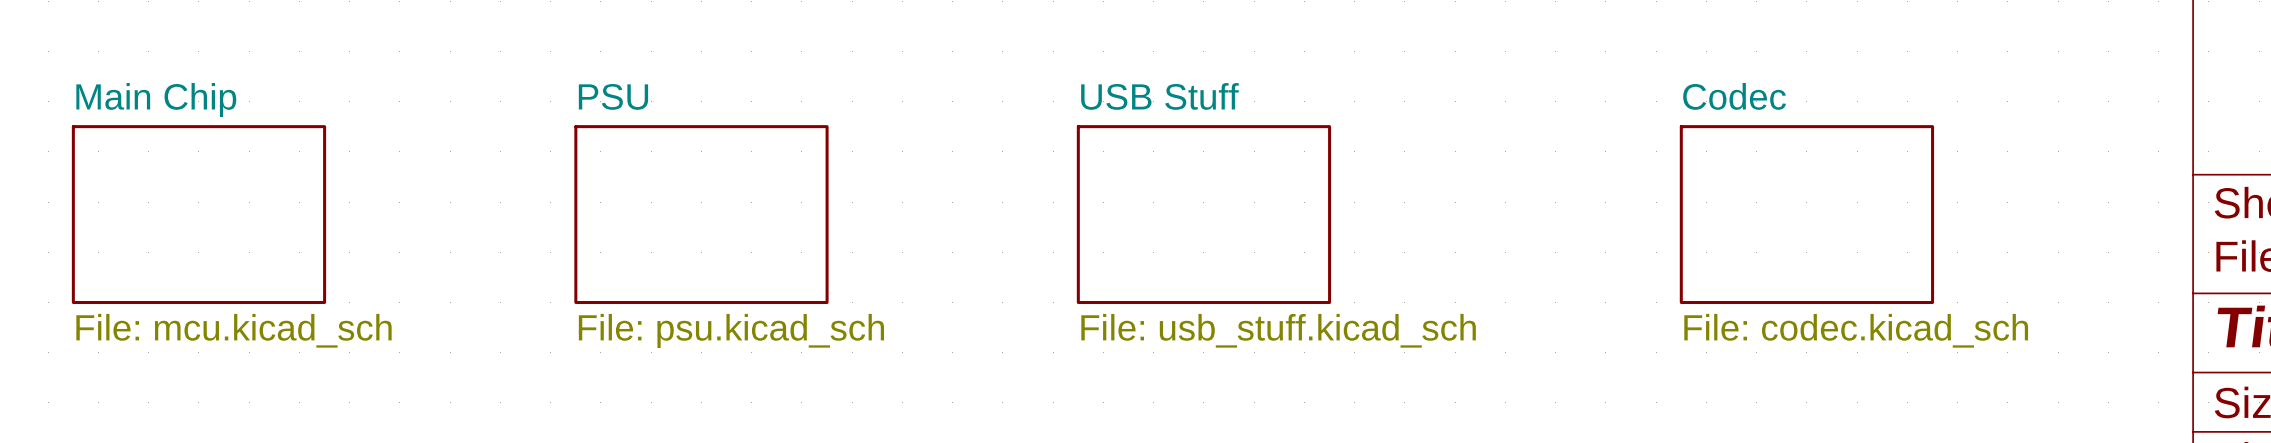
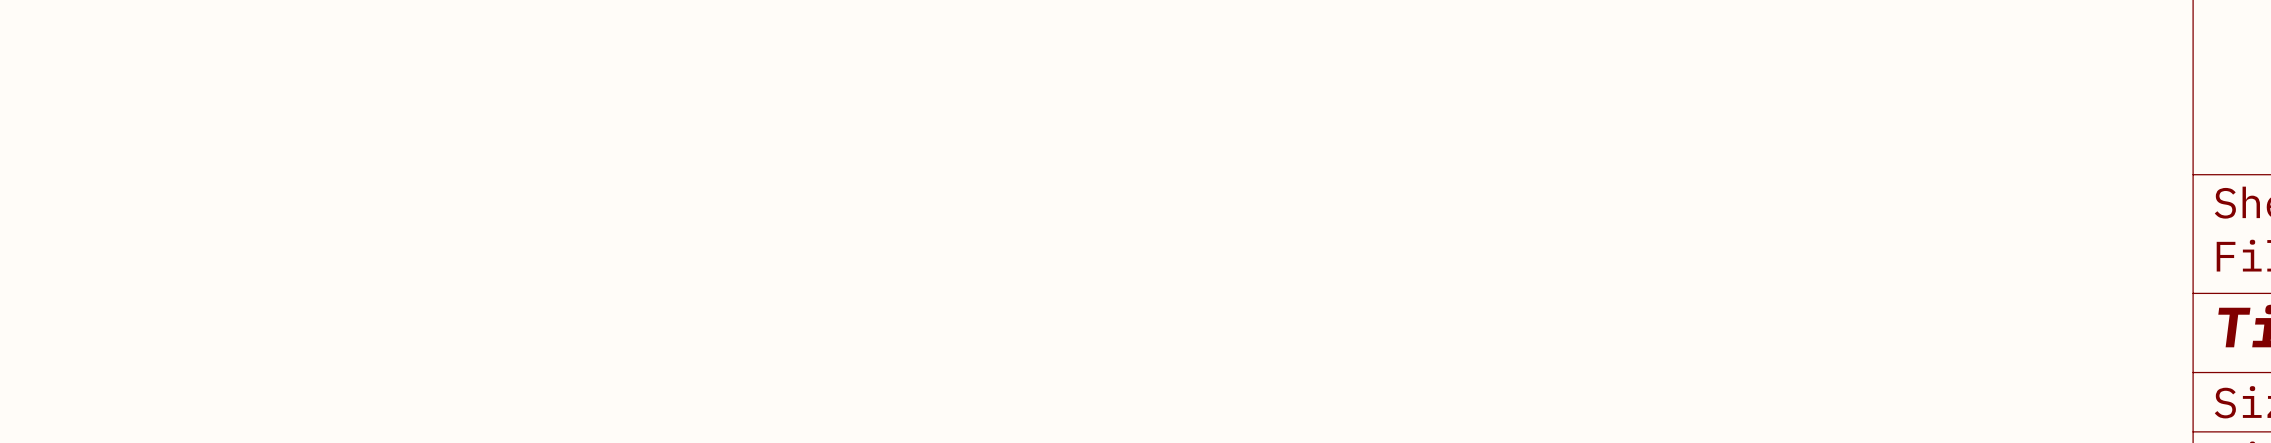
sheet Main Chip: File: mcu.kicad_sch (198, 214) -> none
sheet PSU: File: psu.kicad_sch (701, 214) -> none
sheet USB Stuff: File: usb_stuff.kicad_sch (1203, 214) -> none
sheet Codec: File: codec.kicad_sch (1806, 214) -> none

